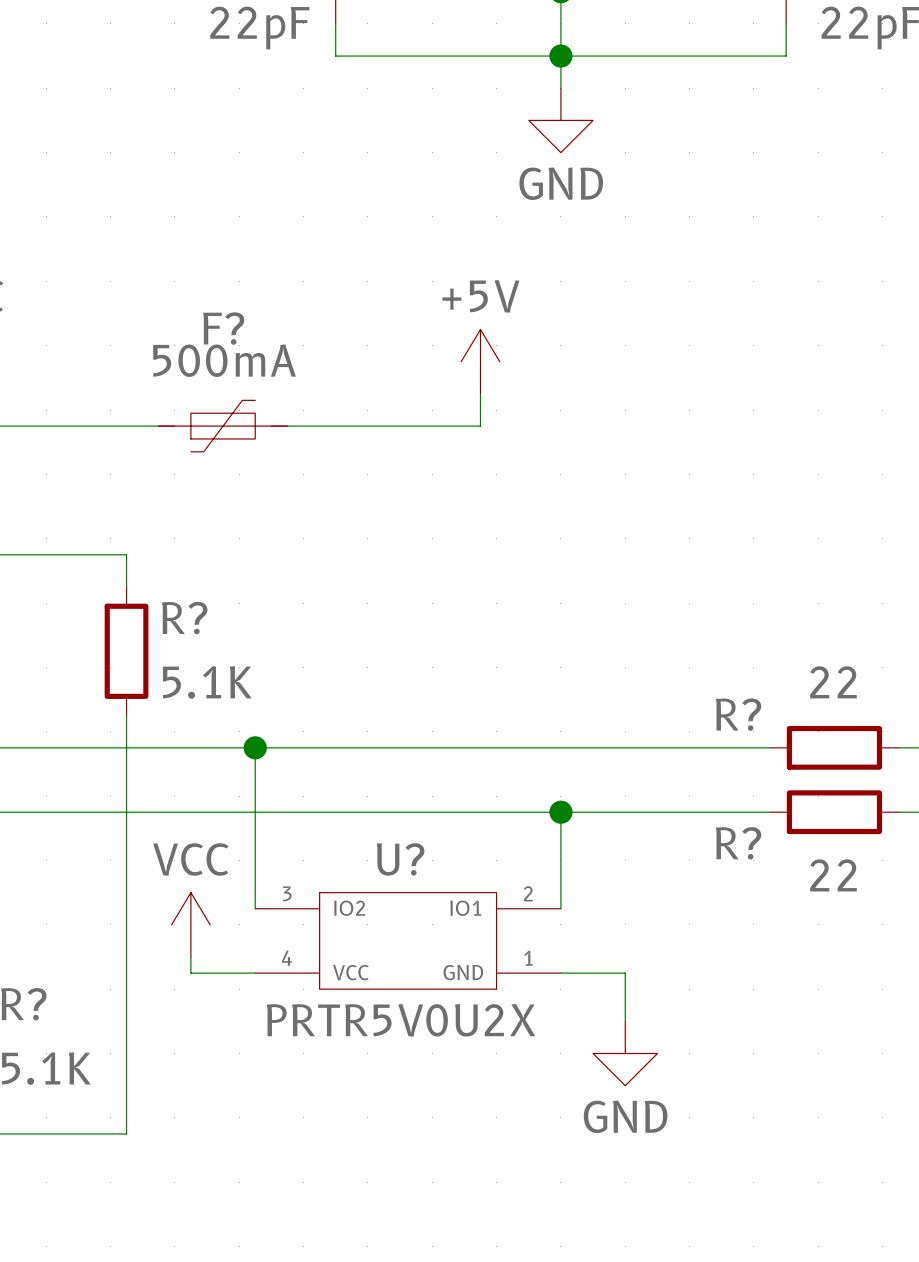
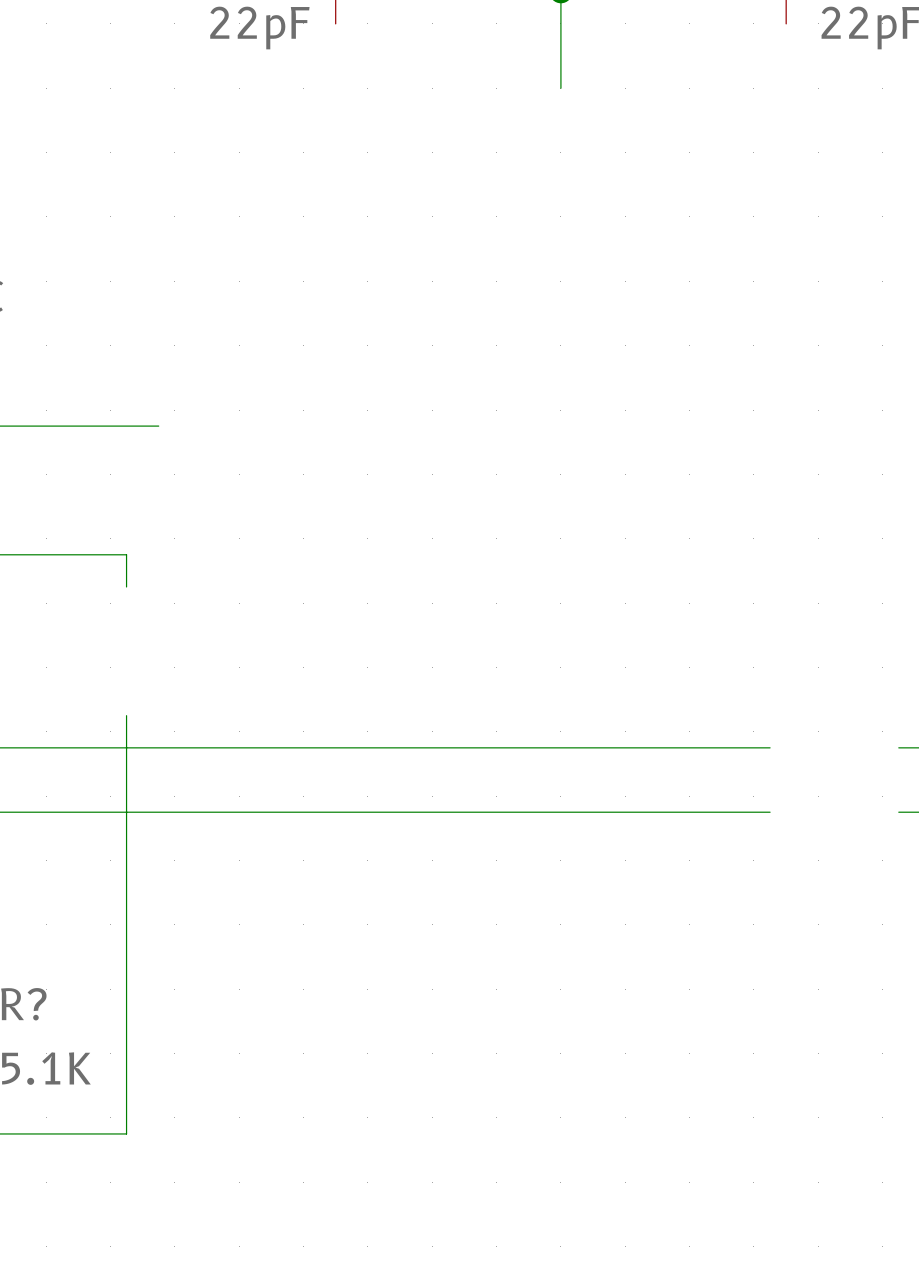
wire: (335, 23) (335, 56) (786, 56) (786, 23) -> none
junction: (560, 56) -> none
power symbol: GND (560, 120) -> none
power symbol: +5V (480, 361) -> none
wire: (480, 393) (480, 426) (287, 426) -> none
F?: 500mA (223, 426) -> none
R?: 5.1K (126, 651) -> none
wire: (255, 747) (255, 908) -> none
junction: (255, 747) -> none
R?: 22 (834, 747) -> none
wire: (560, 812) (560, 908) -> none
junction: (560, 812) -> none
R?: 22 (834, 812) -> none
power symbol: VCC (190, 924) -> none
U?: PRTR5V0U2X (408, 940) -> none
wire: (190, 957) (190, 973) (255, 973) -> none
wire: (560, 973) (625, 973) (625, 1021) -> none
power symbol: GND (625, 1053) -> none

